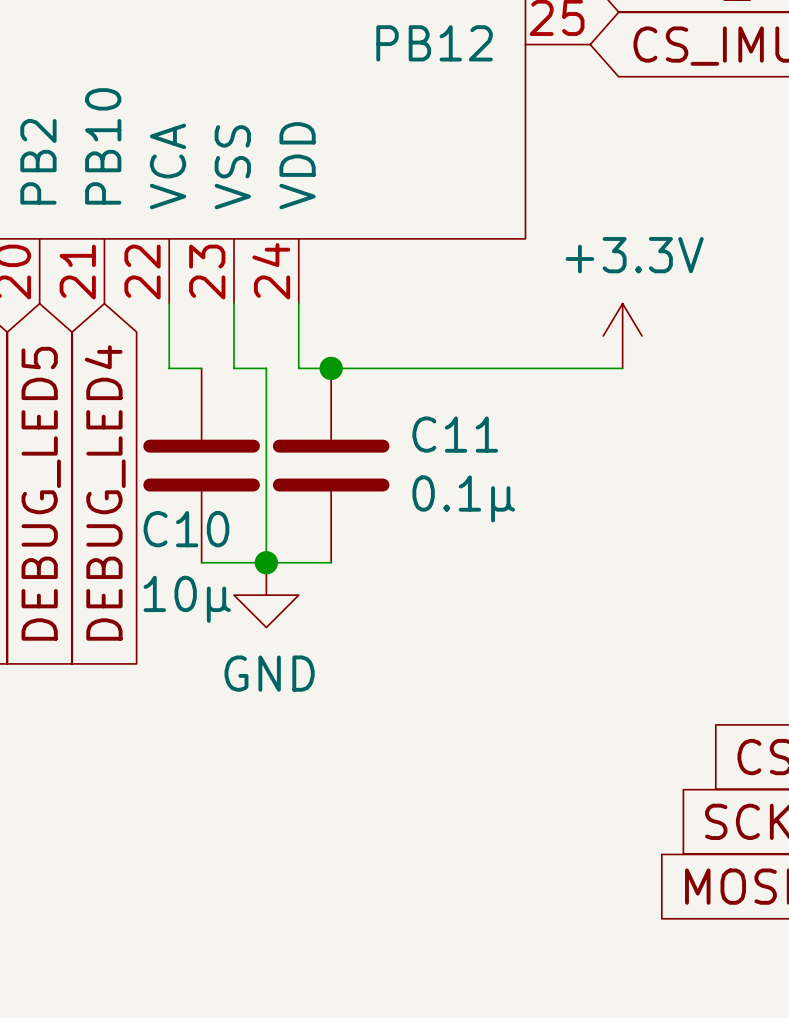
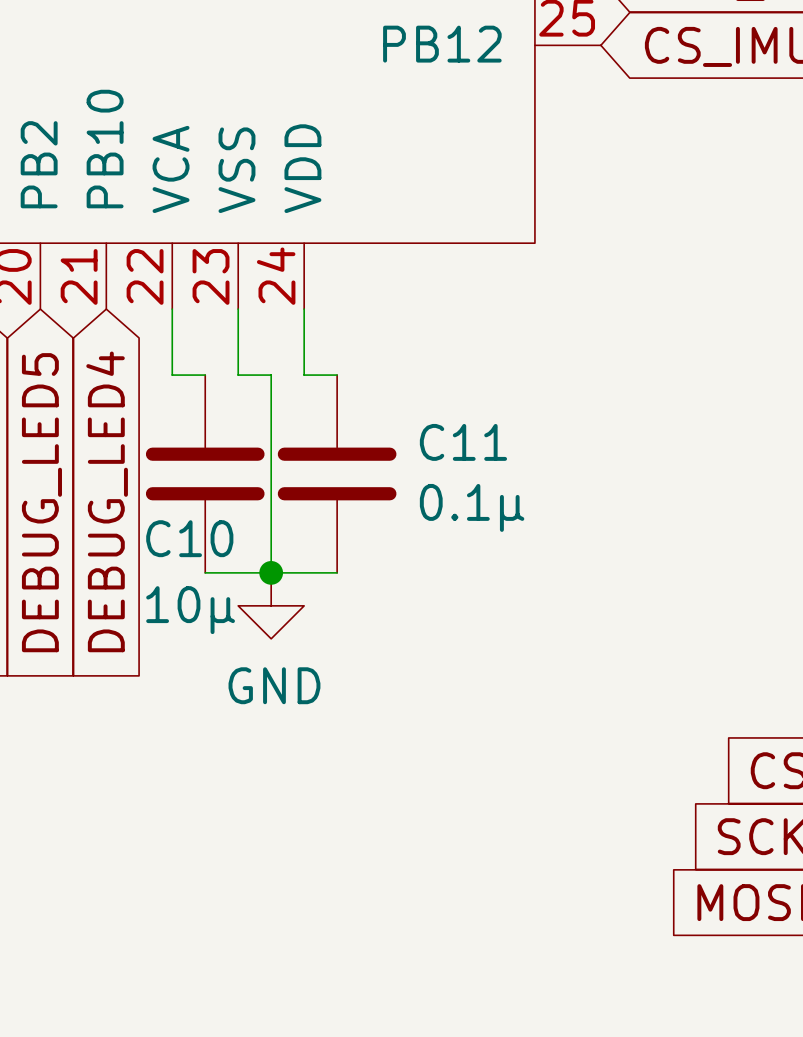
power symbol: +3.3V (622, 336) -> none
wire: (331, 368) (622, 368) -> none
junction: (331, 368) -> none

